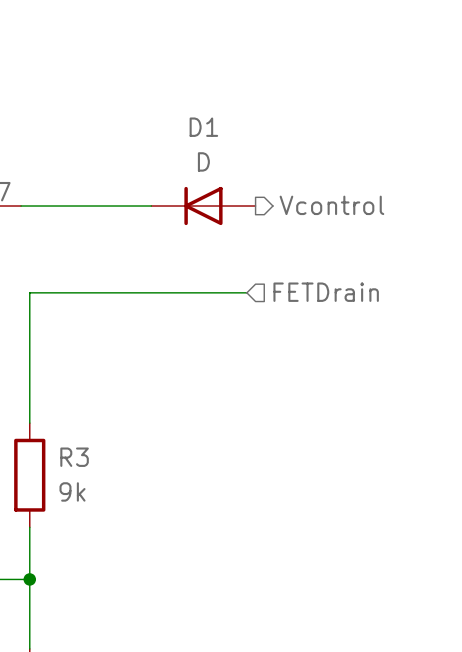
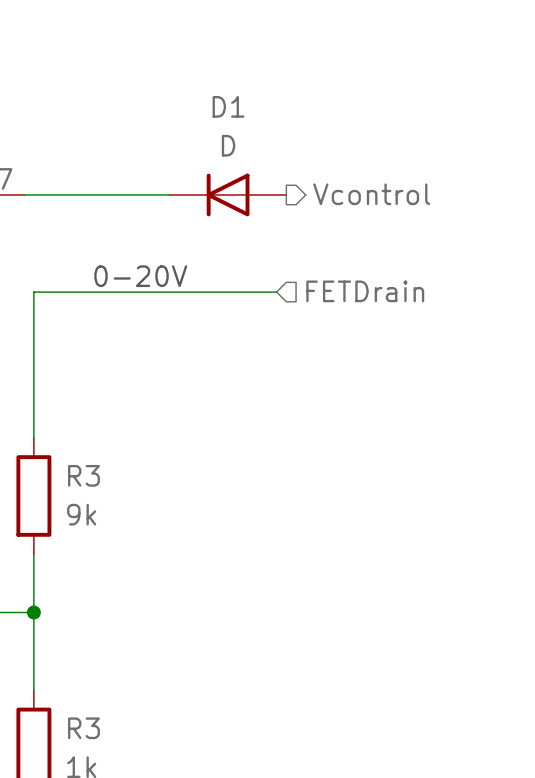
text: none -> 0-20V (140, 276)

